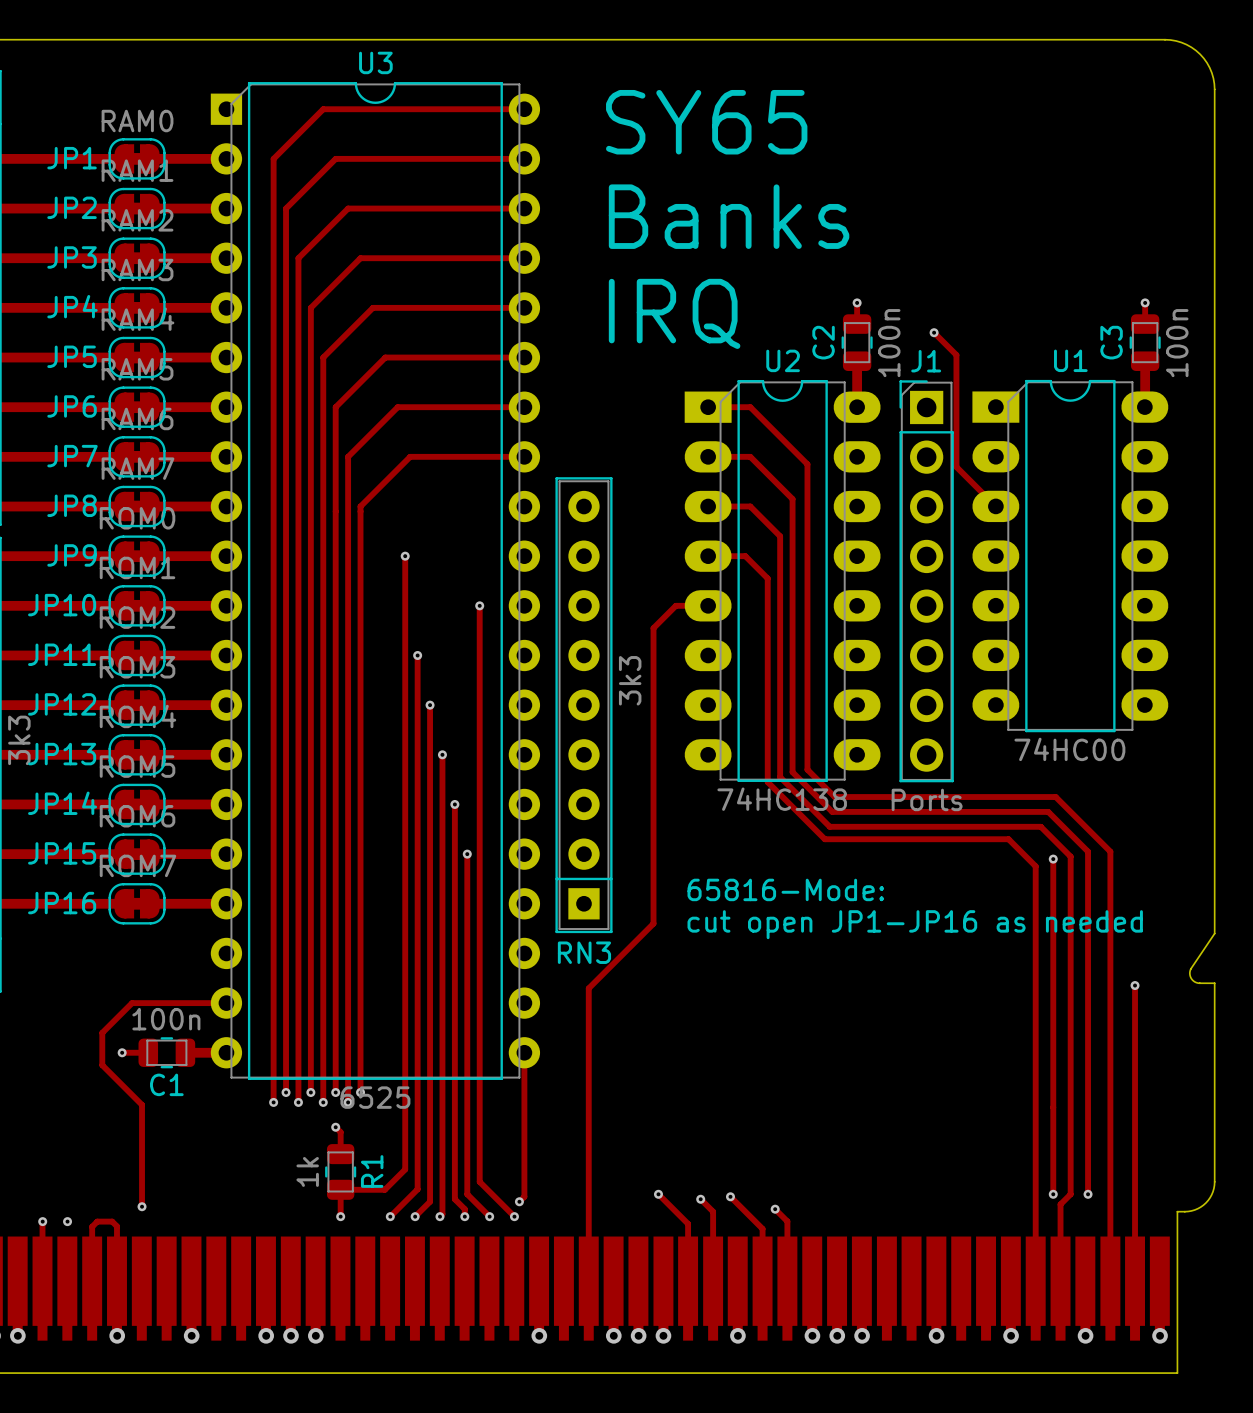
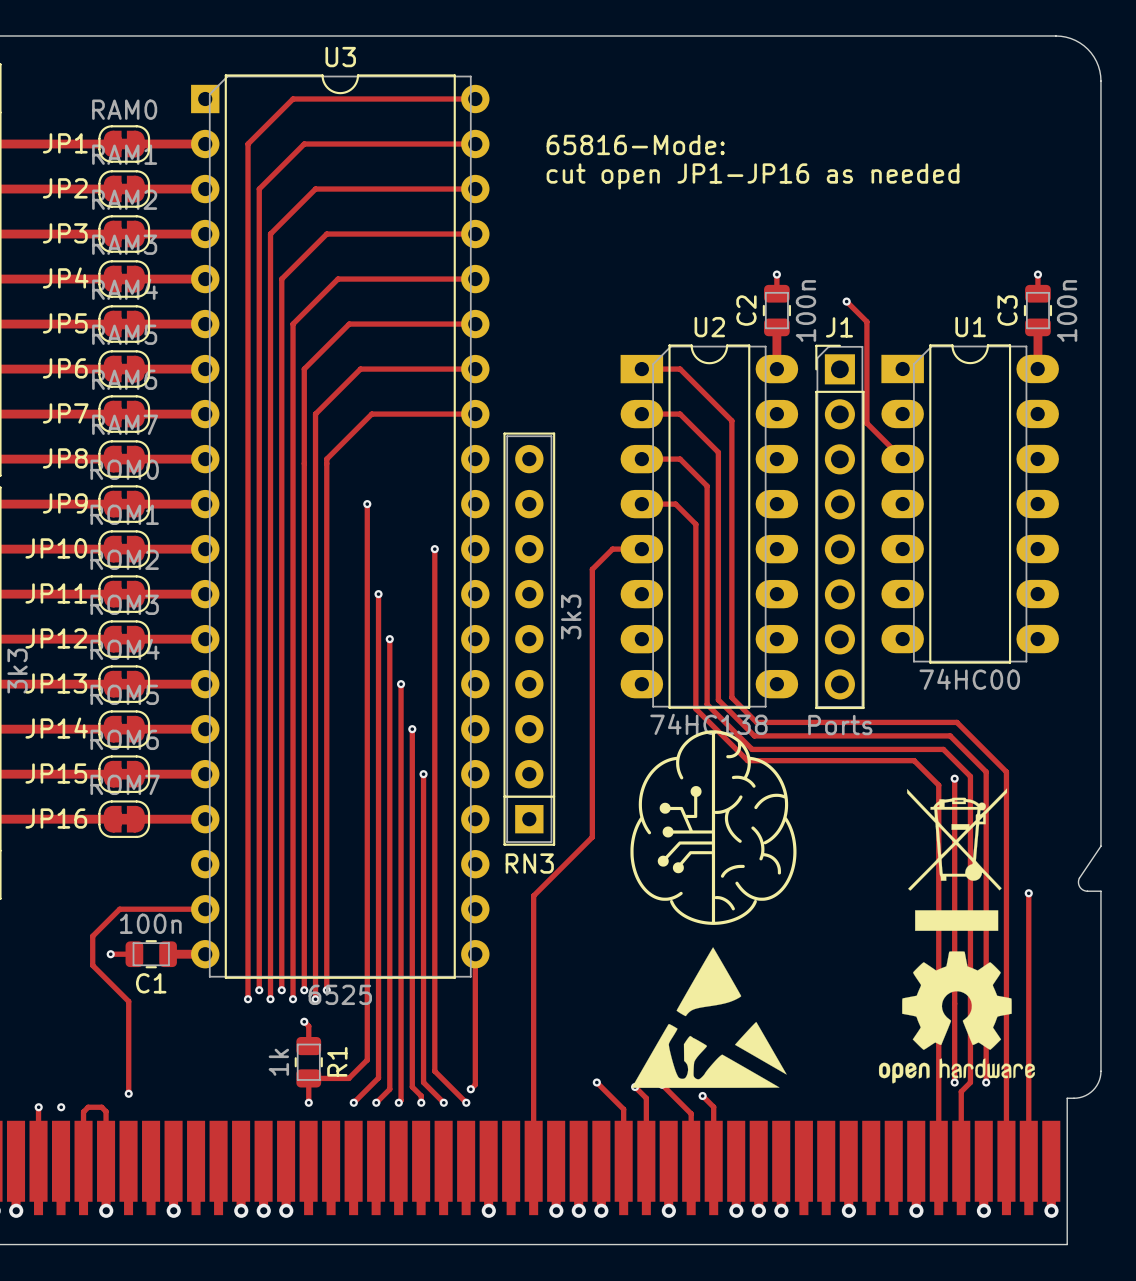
text: SY65 (706, 122) -> 65816-Mode: (635, 144)
text: none -> cut open JP1-JP16 as needed (753, 176)
text: Banks (729, 216) -> none
text: IRQ (674, 313) -> none
drawing: none -> [630, 730, 797, 925]
drawing: none -> [878, 788, 1035, 1084]
text: 65816-Mode: (785, 889) -> none
text: cut open JP1-JP16 as needed (915, 924) -> none
drawing: none -> [631, 947, 787, 1088]

